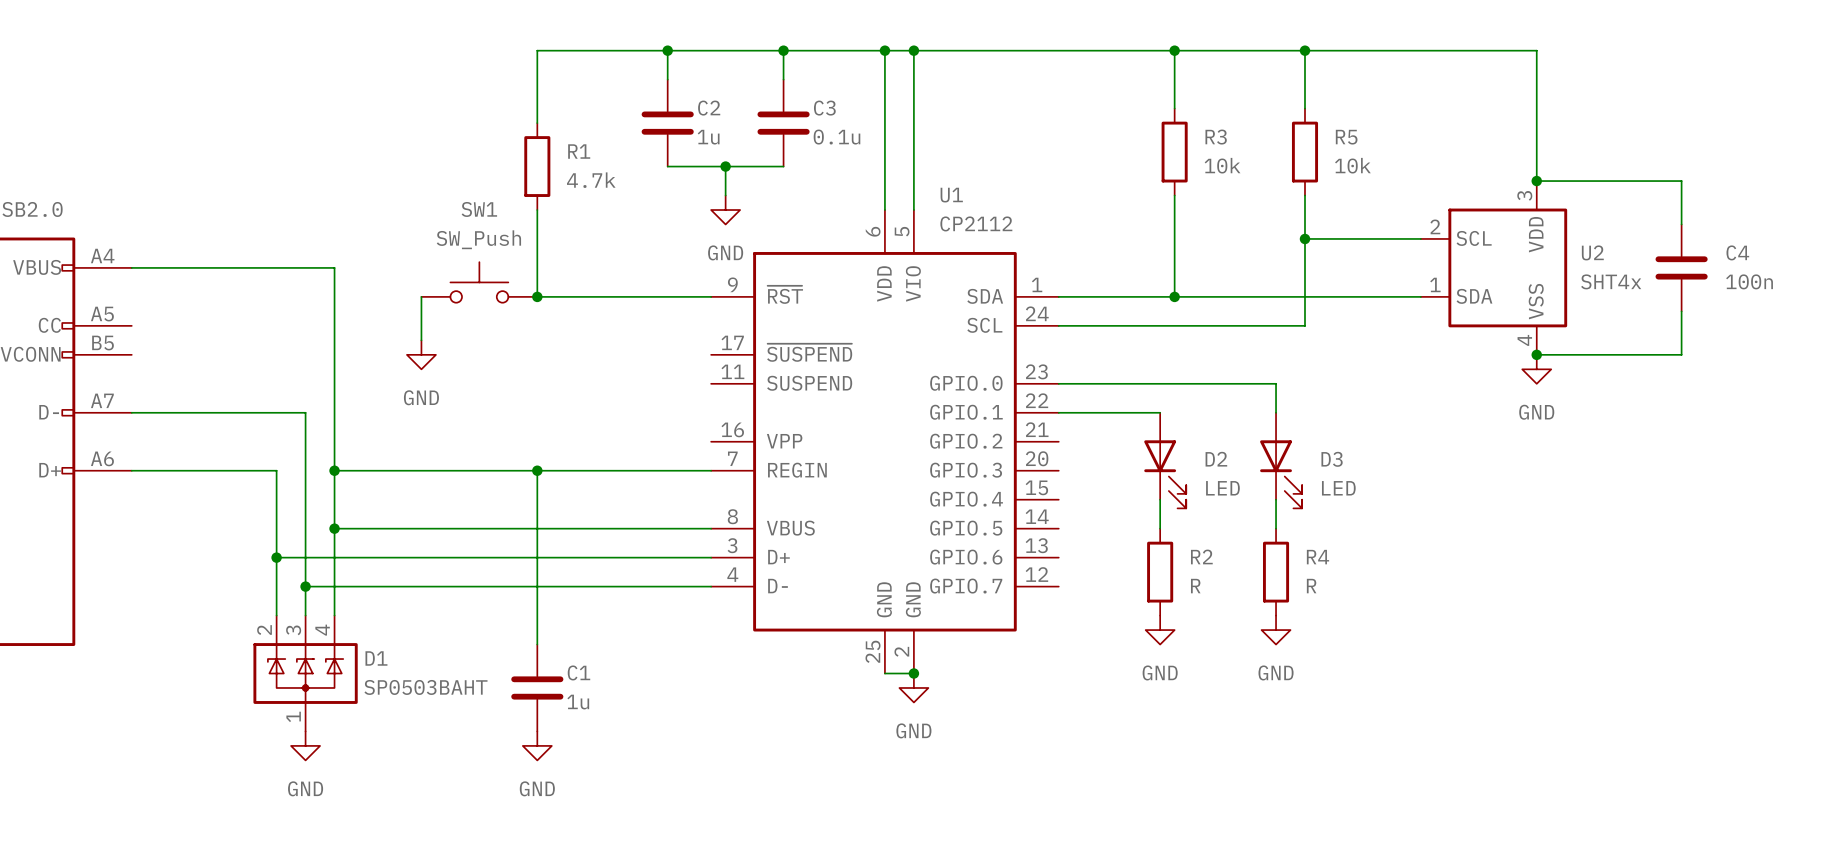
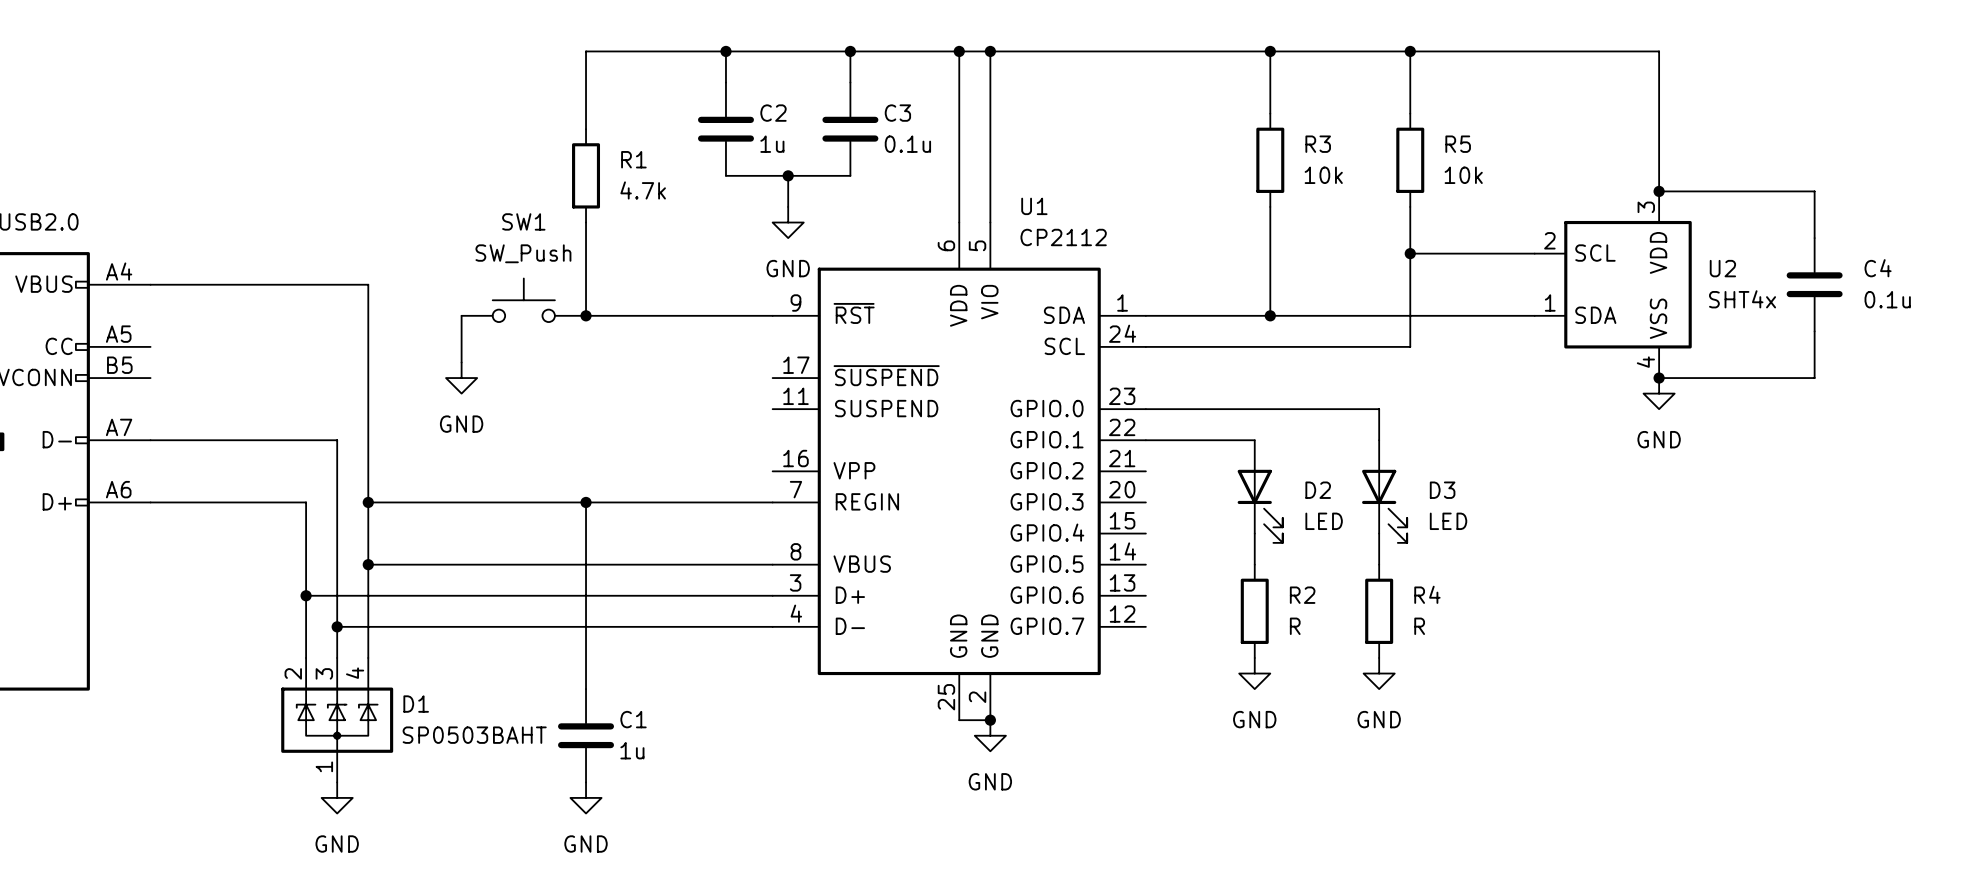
C4 value: 100n (1749, 281) -> 0.1u (1887, 299)

